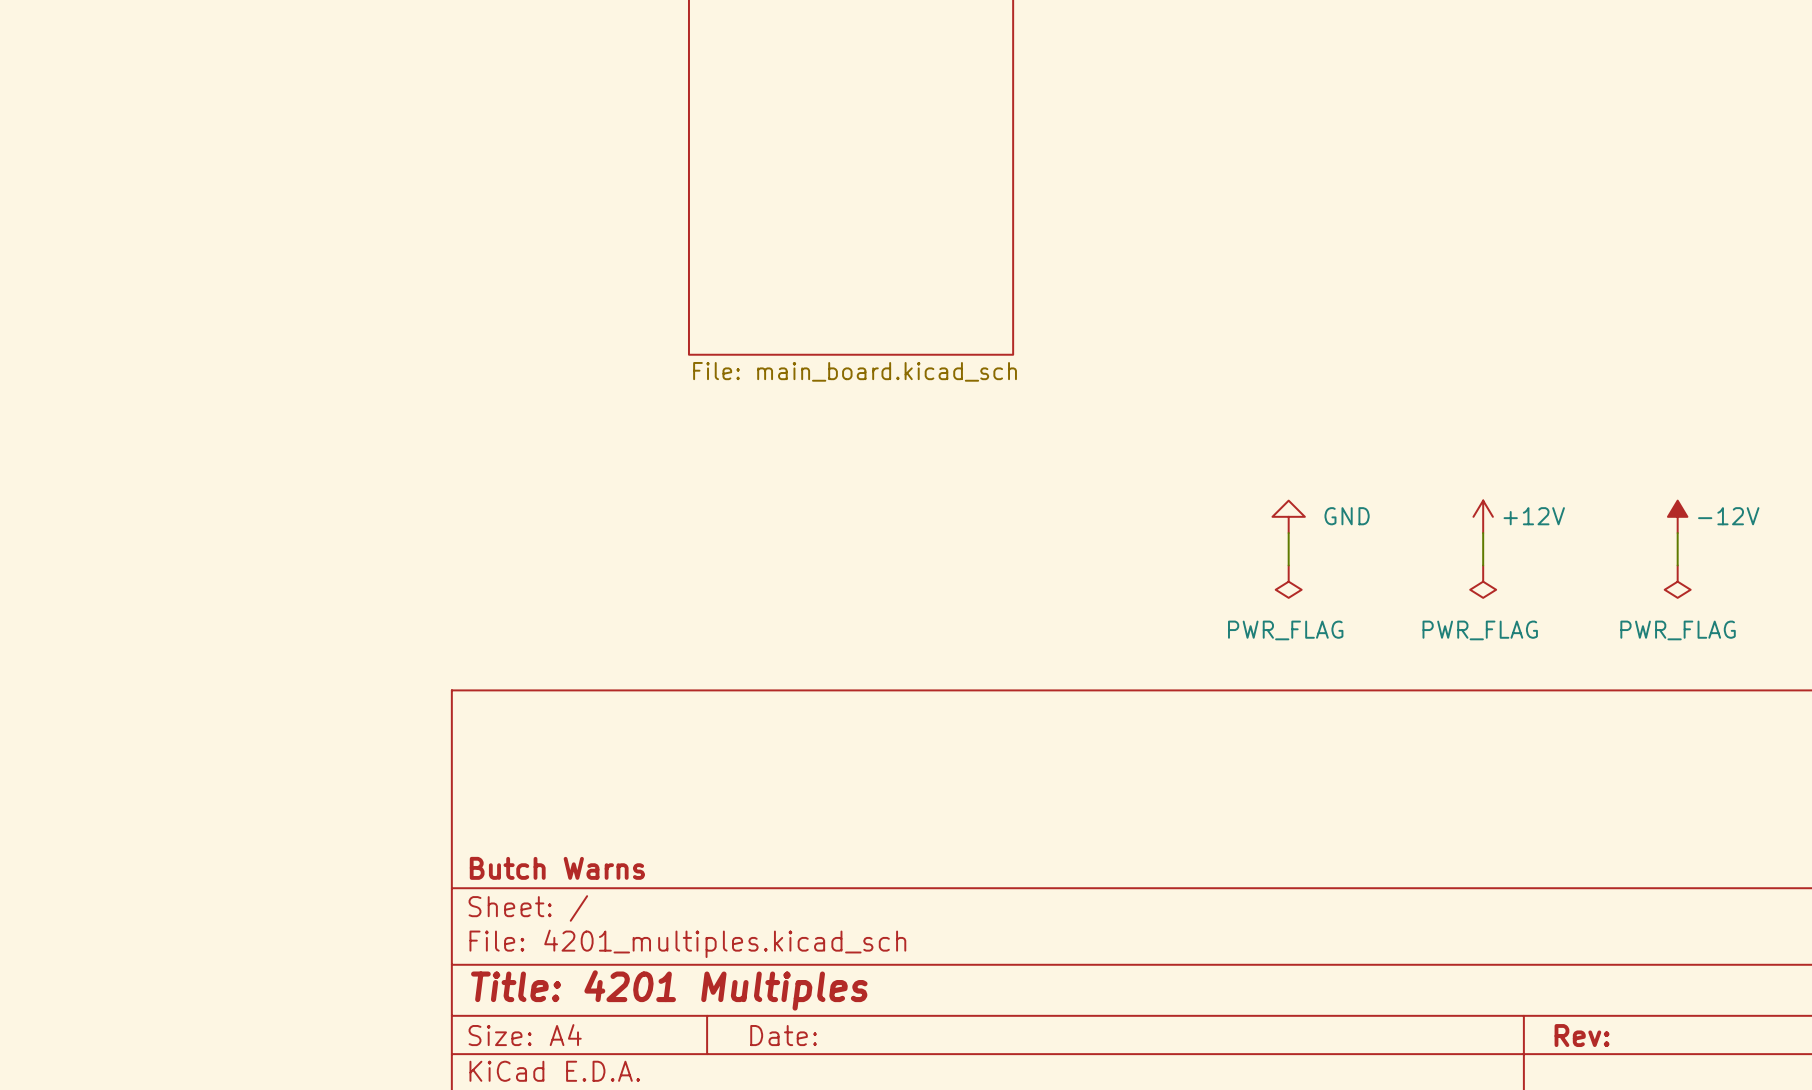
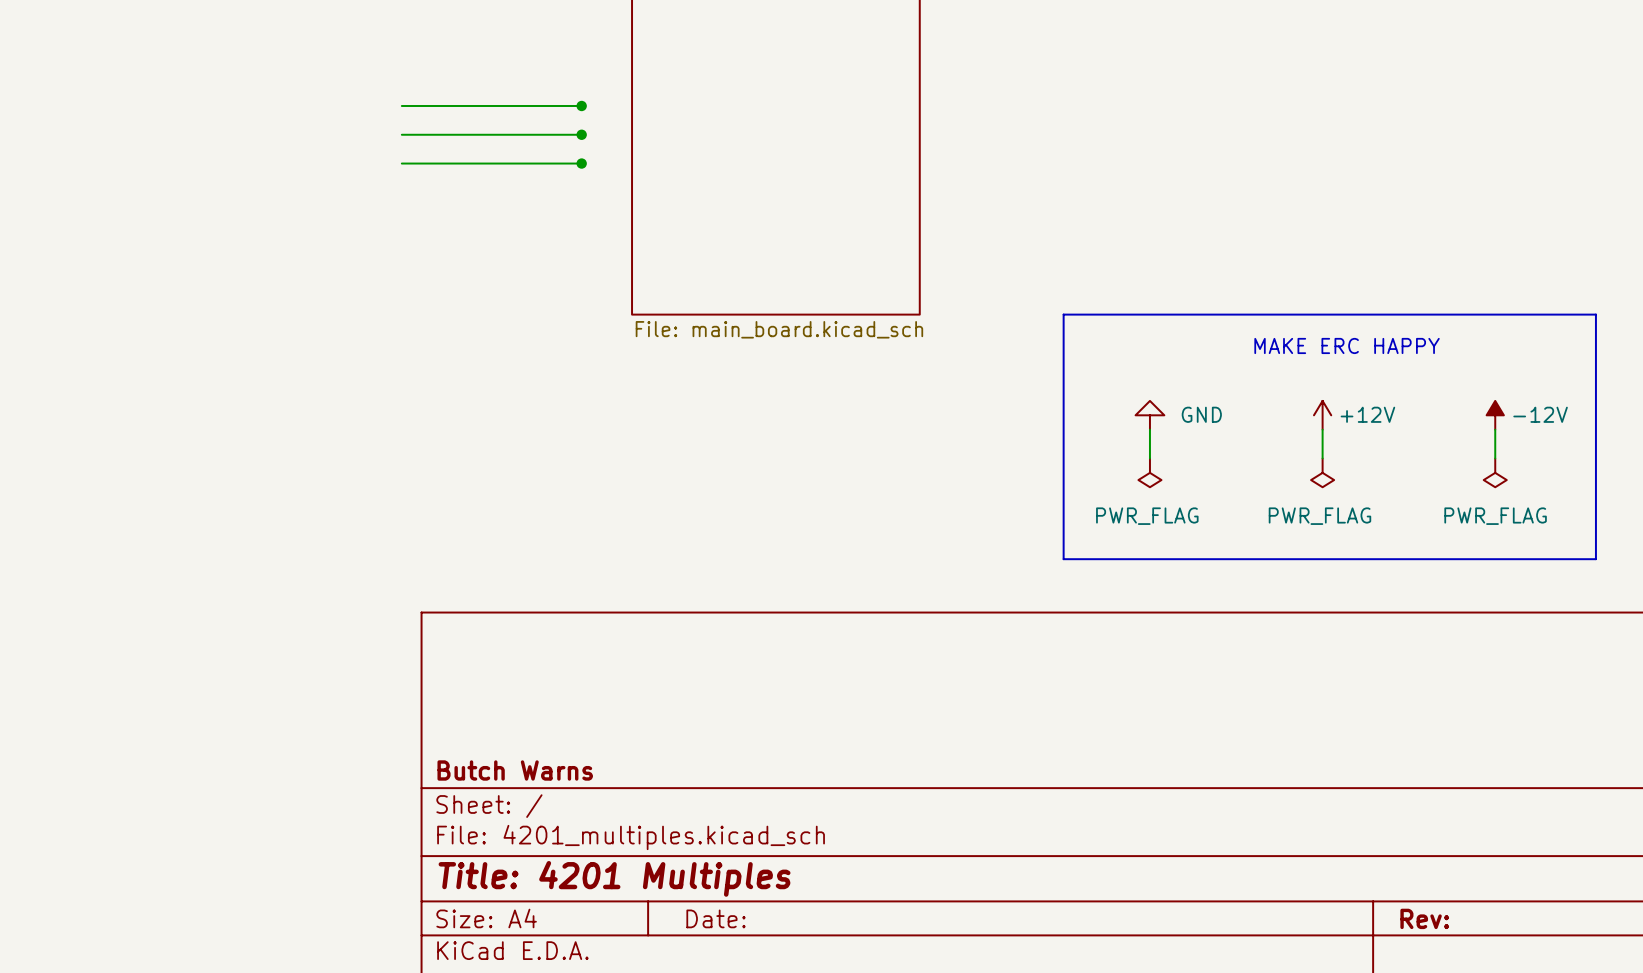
wire: none -> (401, 105) (581, 105)
junction: none -> (581, 105)
wire: none -> (401, 134) (581, 134)
junction: none -> (581, 134)
wire: none -> (401, 163) (581, 163)
junction: none -> (581, 163)
line: none -> (1063, 314) (1595, 314) (1595, 559) (1063, 559) (1063, 314)
text: none -> MAKE ERC HAPPY (1347, 345)
power symbol position: GND (1288, 516) -> GND (1149, 415)
power symbol position: +12V (1483, 516) -> +12V (1322, 415)
power symbol position: -12V (1677, 516) -> -12V (1495, 415)
wire: (1288, 533) (1288, 565) -> (1149, 429) (1149, 458)
wire: (1483, 533) (1483, 565) -> (1322, 429) (1322, 458)
wire: (1677, 533) (1677, 565) -> (1495, 429) (1495, 458)
power symbol position: PWR_FLAG (1288, 581) -> PWR_FLAG (1149, 472)
power symbol position: PWR_FLAG (1483, 581) -> PWR_FLAG (1322, 472)
power symbol position: PWR_FLAG (1677, 581) -> PWR_FLAG (1495, 472)

